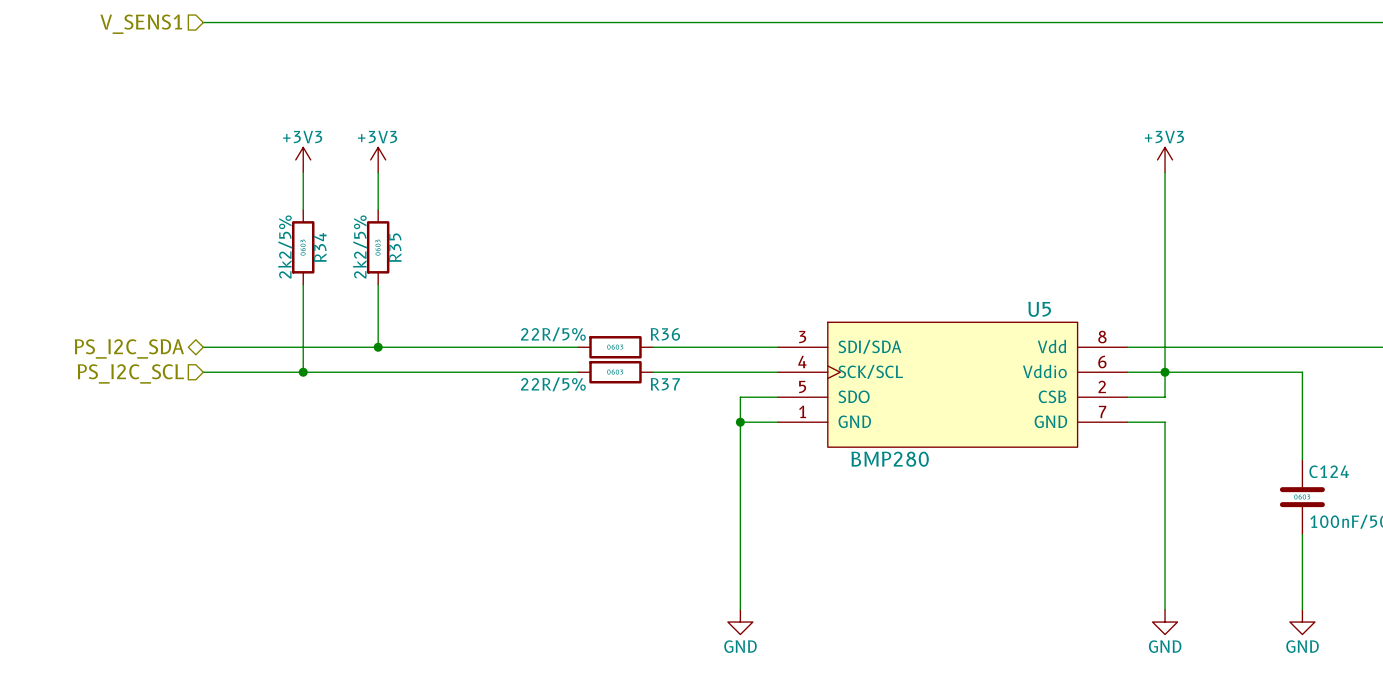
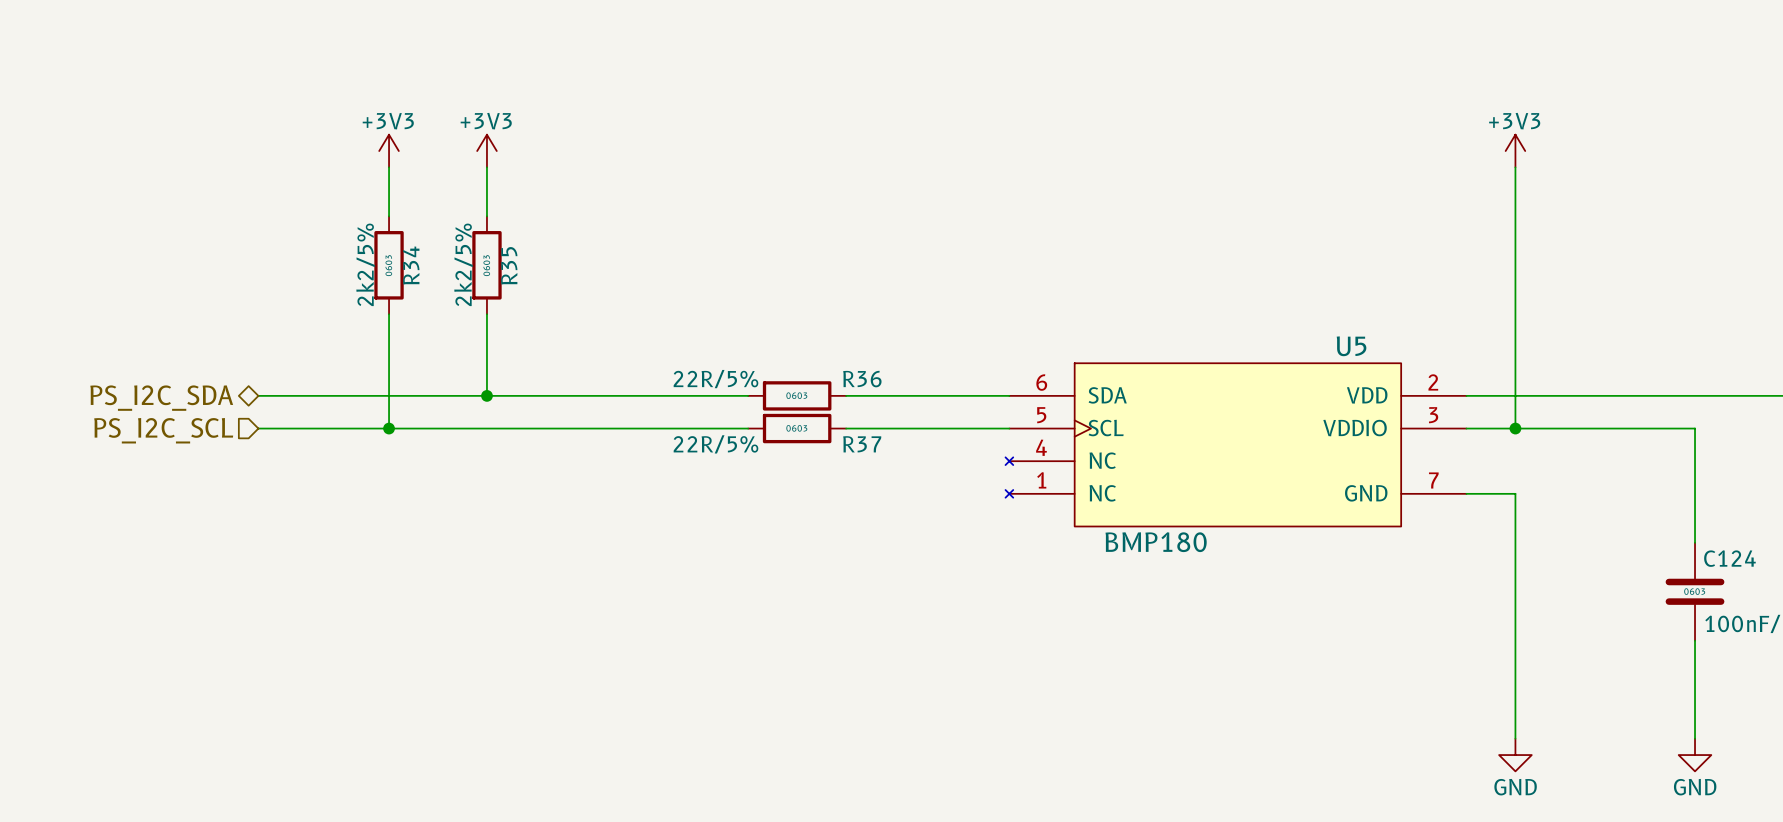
U5 symbol: [777, 322, 1128, 448] -> [1005, 363, 1467, 527]
wire: (1165, 372) (1165, 397) (1127, 397) -> none
wire: (777, 397) (740, 397) (740, 609) -> none
wire: (740, 422) (777, 422) -> none
junction: (740, 422) -> none
U5 value: BMP280 (890, 459) -> BMP180 (1156, 542)
power symbol: GND (740, 622) -> none

